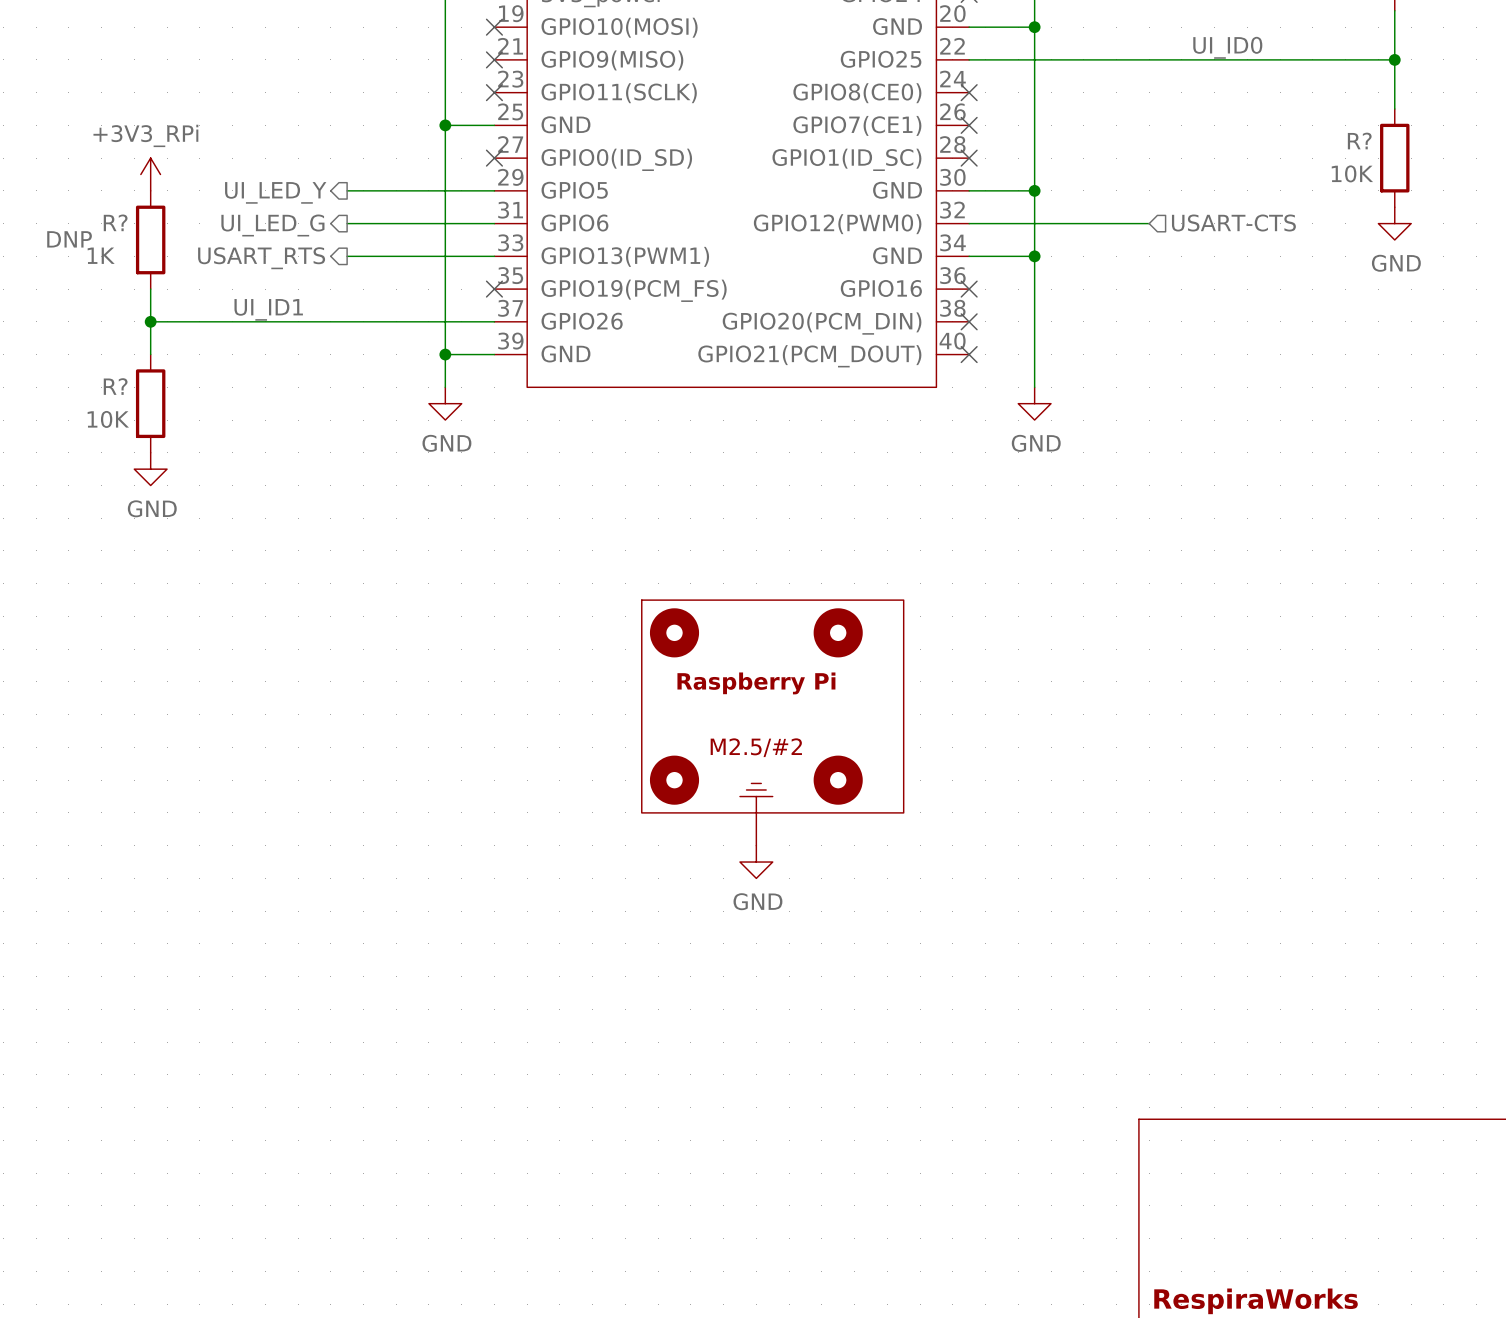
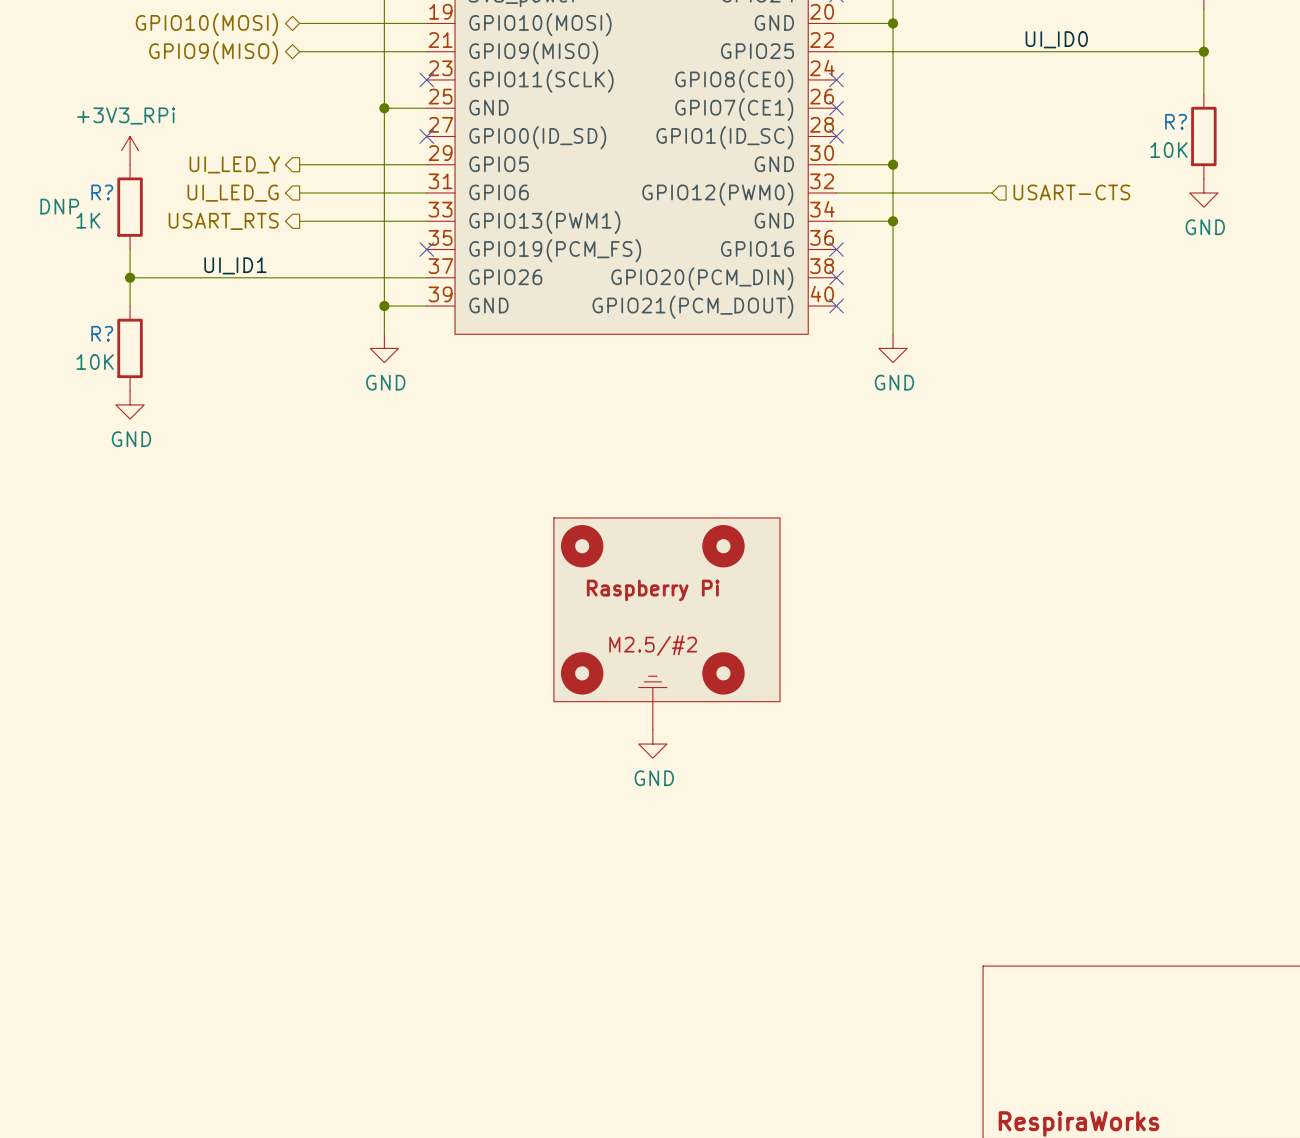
hierarchical label: none -> GPIO10(MOSI) (206, 24)
wire: none -> (299, 23) (426, 23)
no-connect mark: (494, 27) -> none
wire: none -> (299, 51) (426, 51)
no-connect mark: (494, 59) -> none
hierarchical label: none -> GPIO9(MISO) (213, 52)

